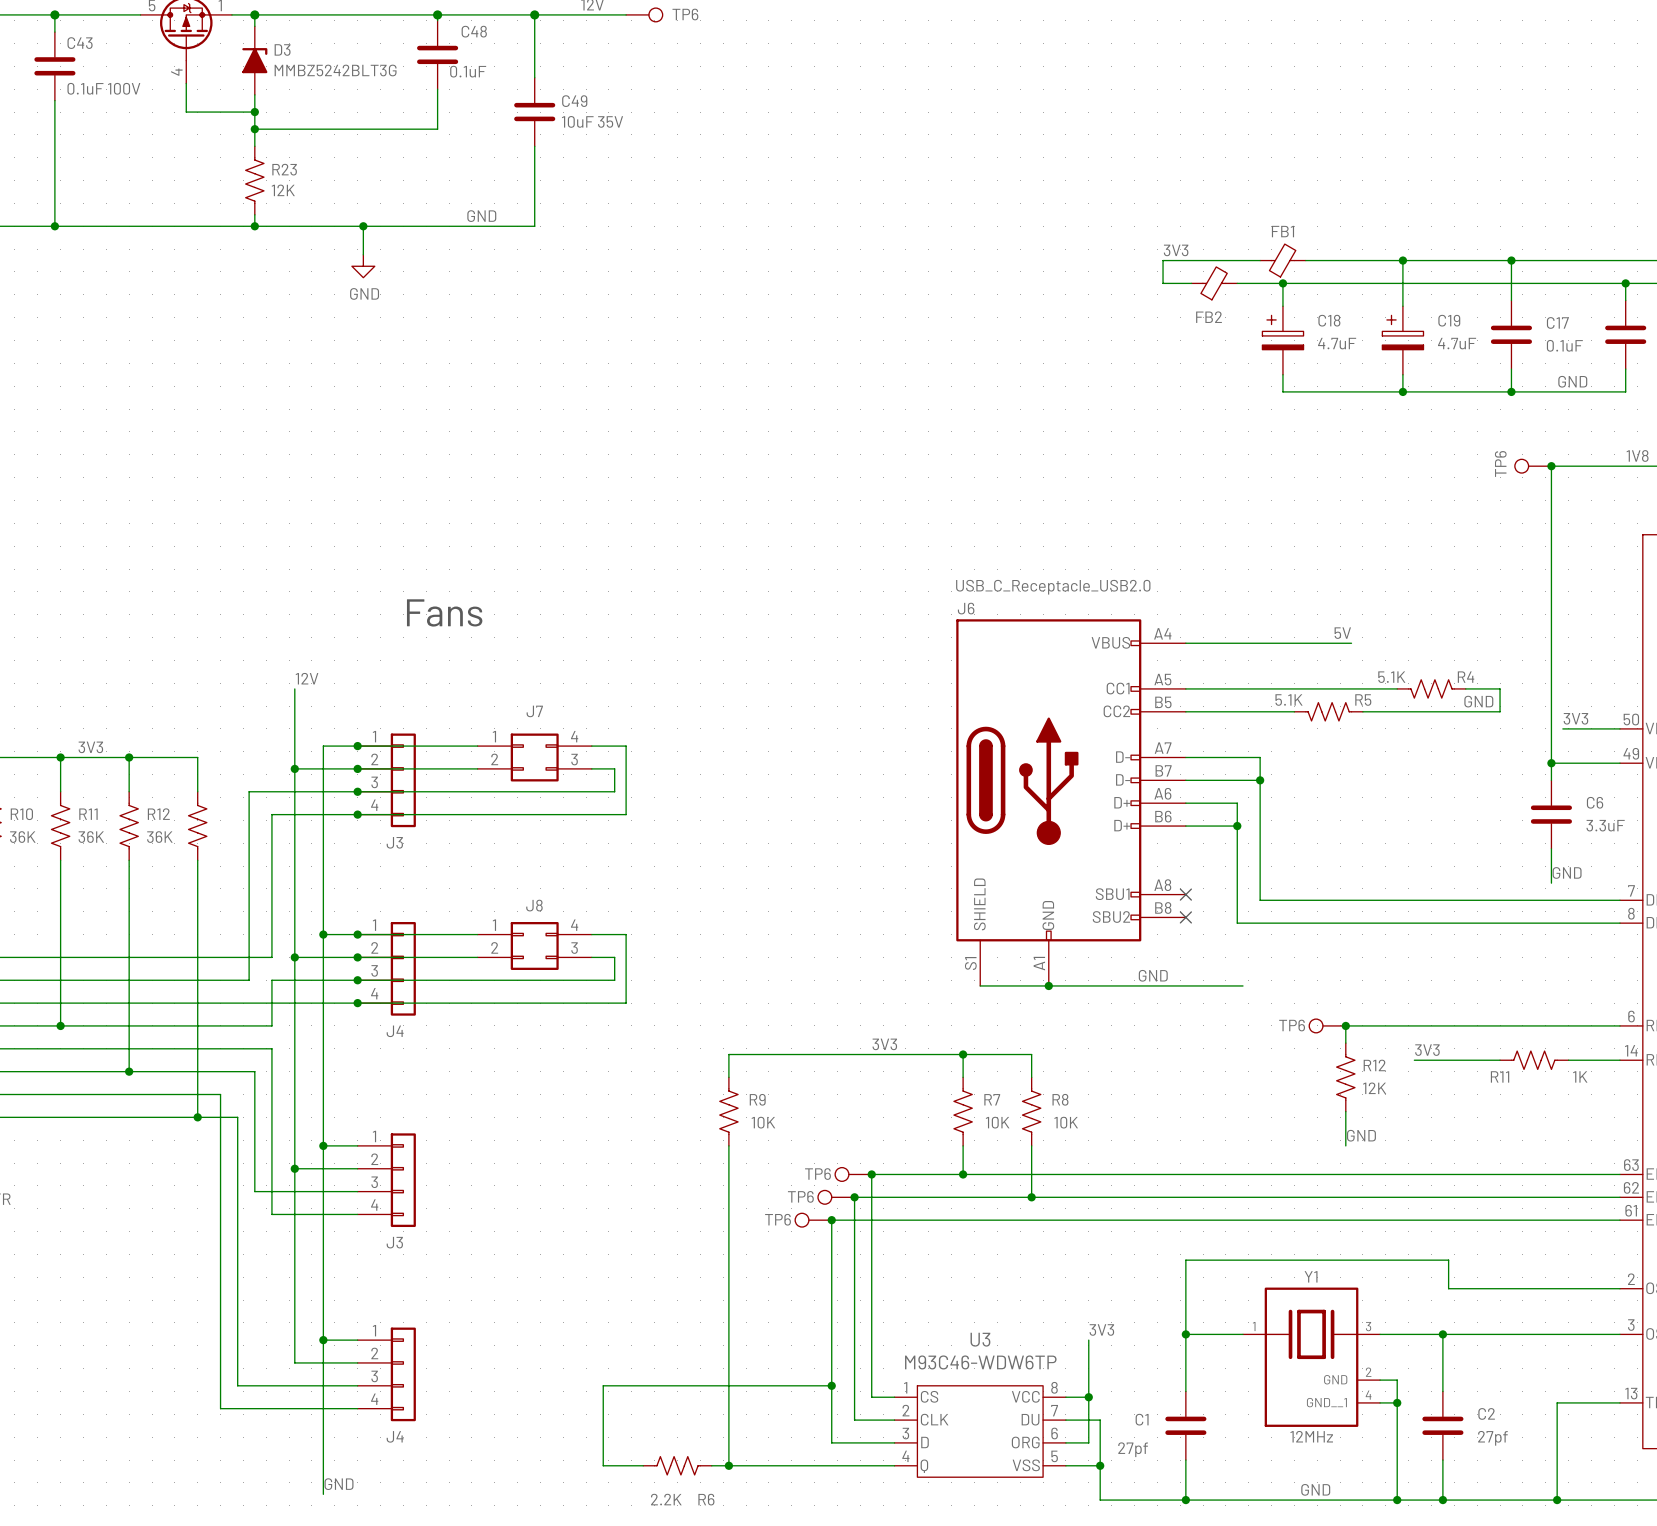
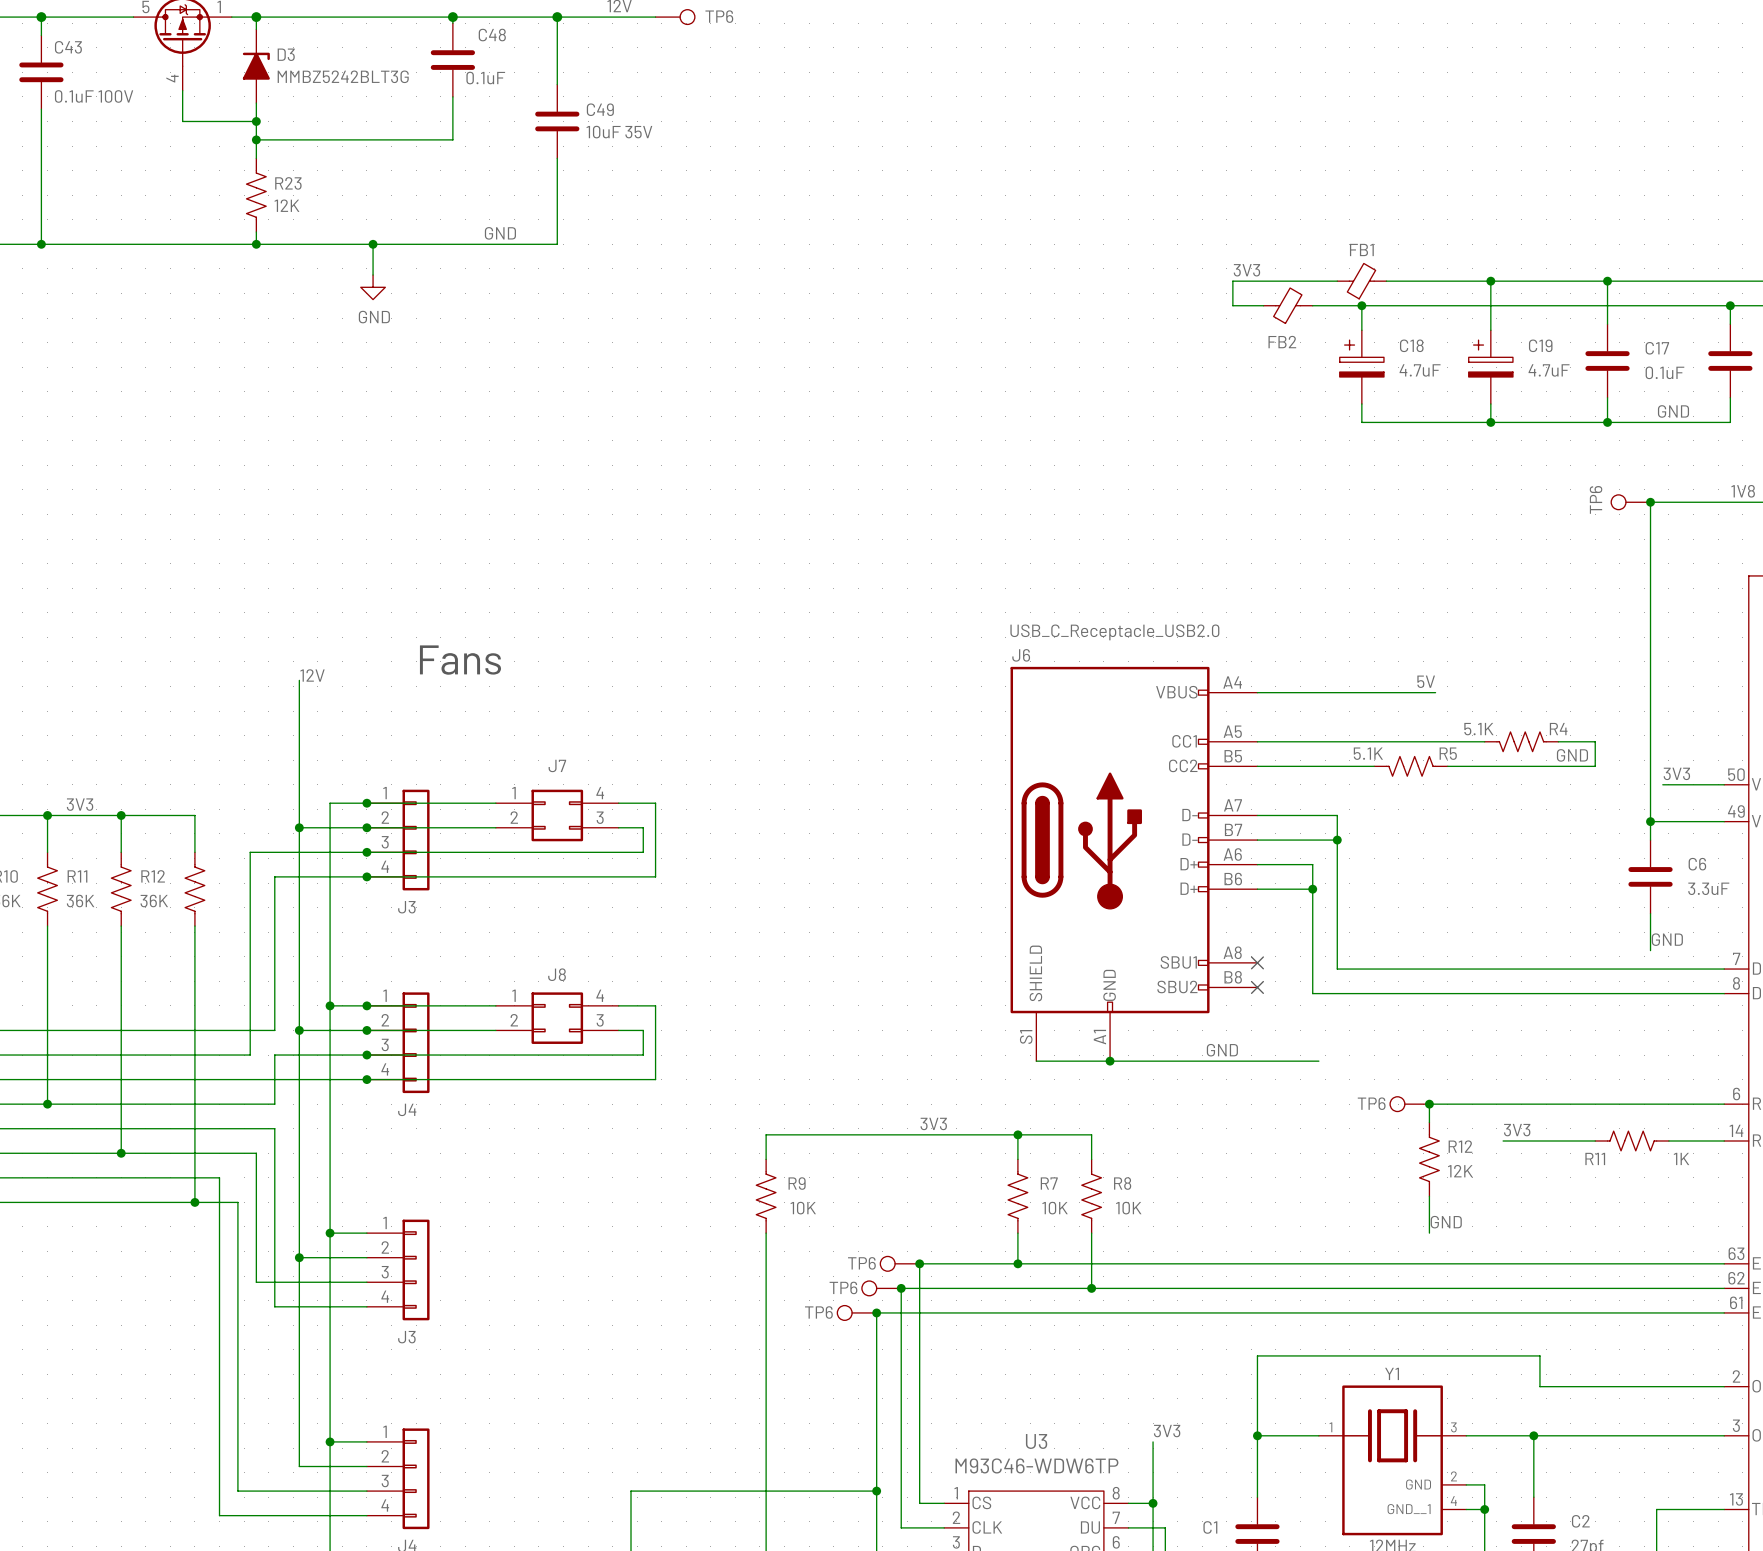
wire: none -> (299, 680) (299, 741)
label position: 12V (307, 678) -> 12V (312, 675)

